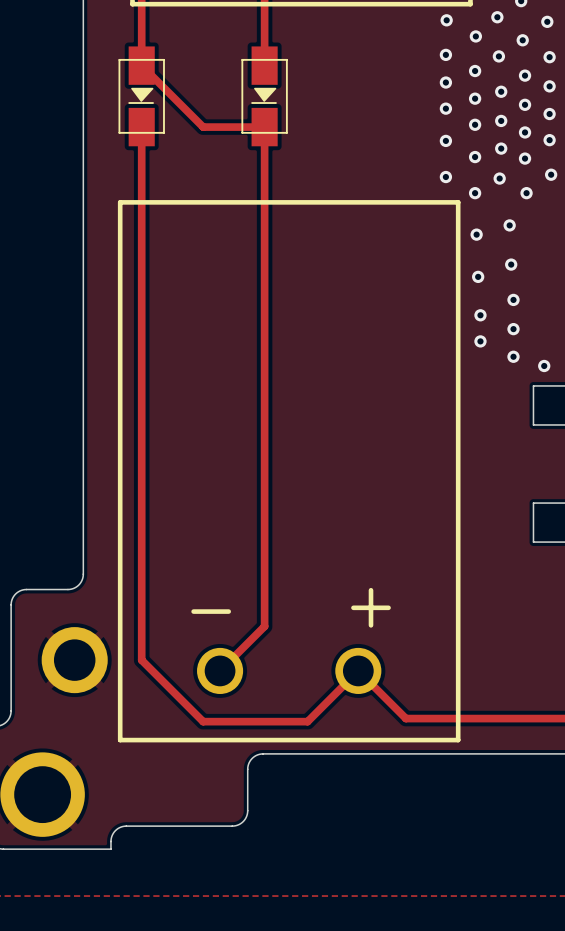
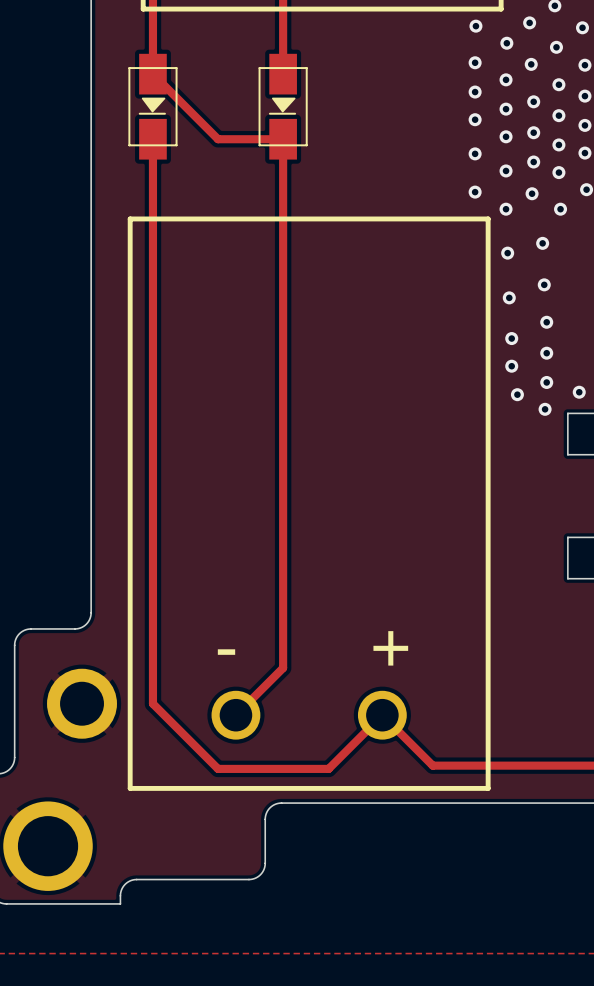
via: none -> (517, 394)
via: none -> (545, 409)

